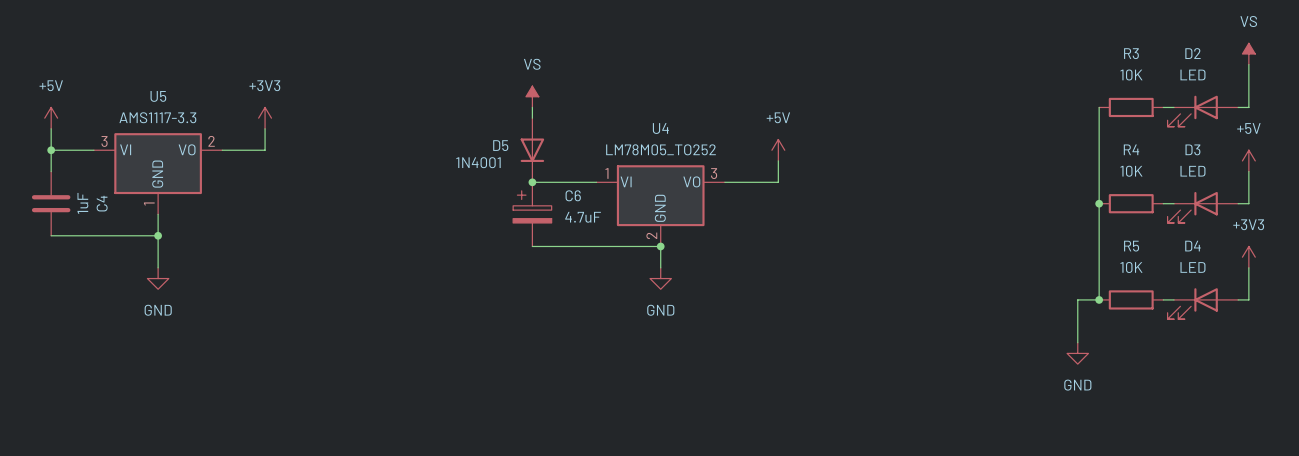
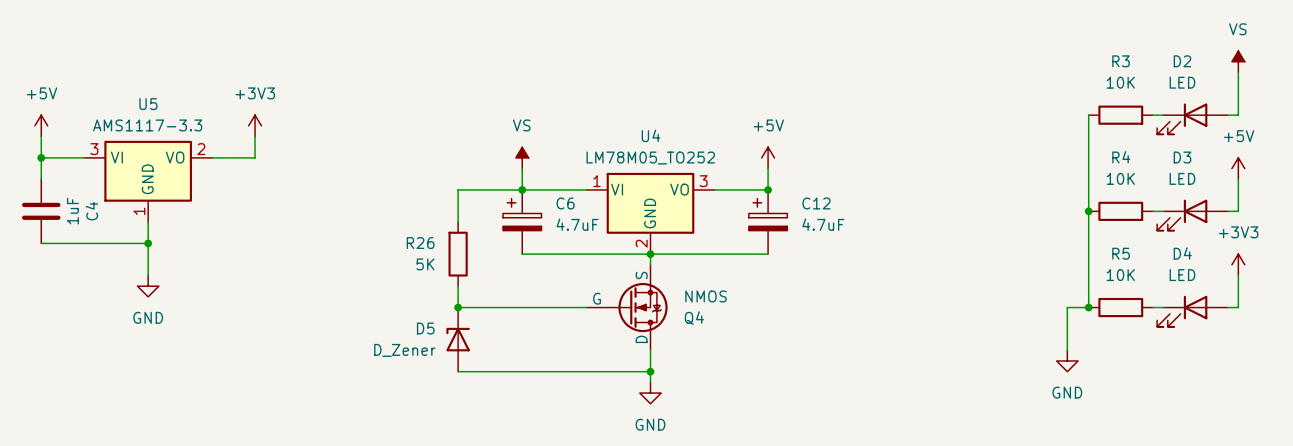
power symbol position: VS (532, 96) -> VS (522, 157)
wire: (532, 107) (532, 118) -> none
D5 symbol: [520, 118, 545, 183] -> [446, 307, 470, 372]
wire: none -> (522, 168) (522, 189) (458, 189) (458, 222)
D5 value: 1N4001 (478, 162) -> D_Zener (404, 350)
junction: none -> (768, 189)
C12: none -> 4.7uF (768, 222)
R26: none -> 5K (458, 254)
wire: none -> (650, 254) (768, 254)
wire: none -> (458, 286) (458, 307) (586, 307)
power symbol position: GND (660, 278) -> GND (650, 393)
junction: none -> (458, 307)
Q4: none -> NMOS (626, 307)
wire: none -> (650, 350) (650, 382)
wire: none -> (458, 371) (650, 371)
junction: none -> (650, 371)

